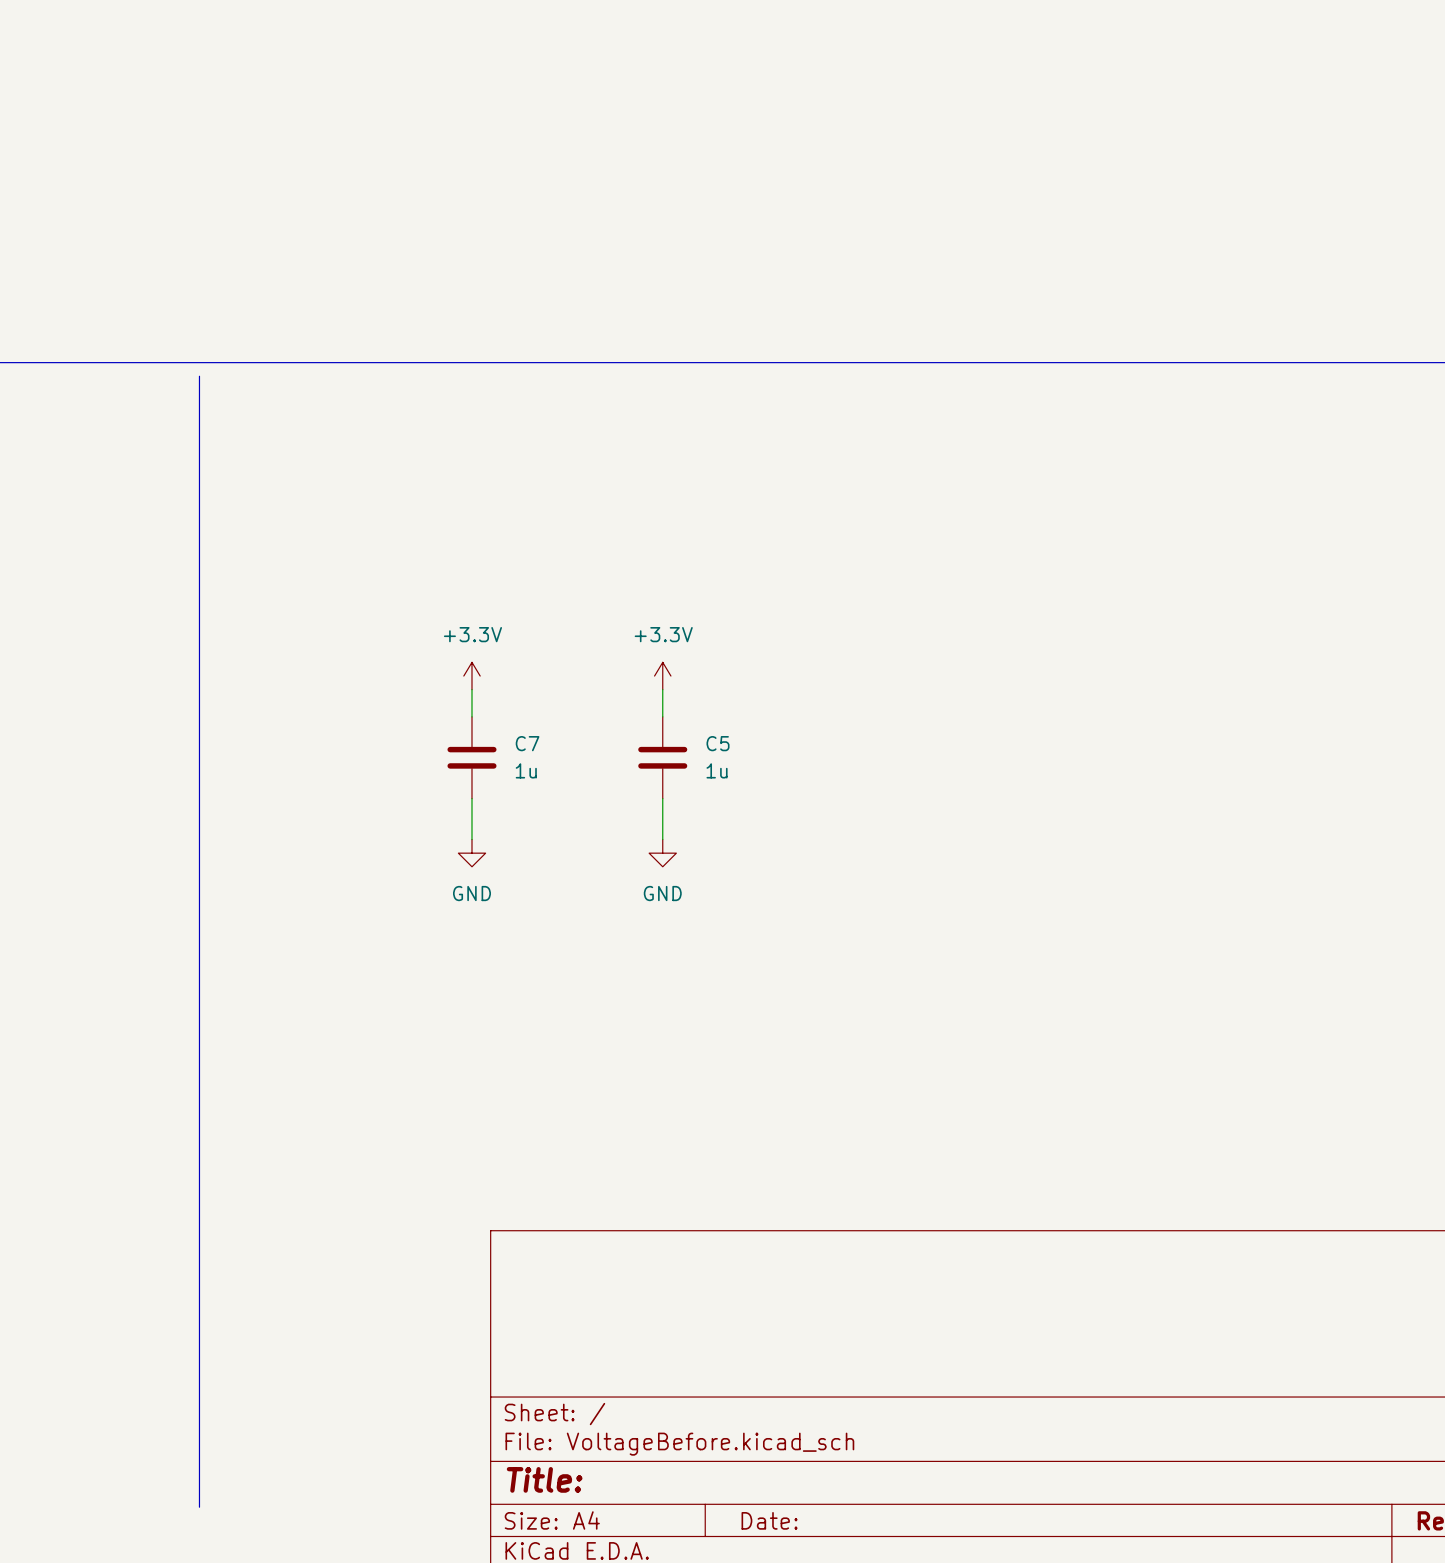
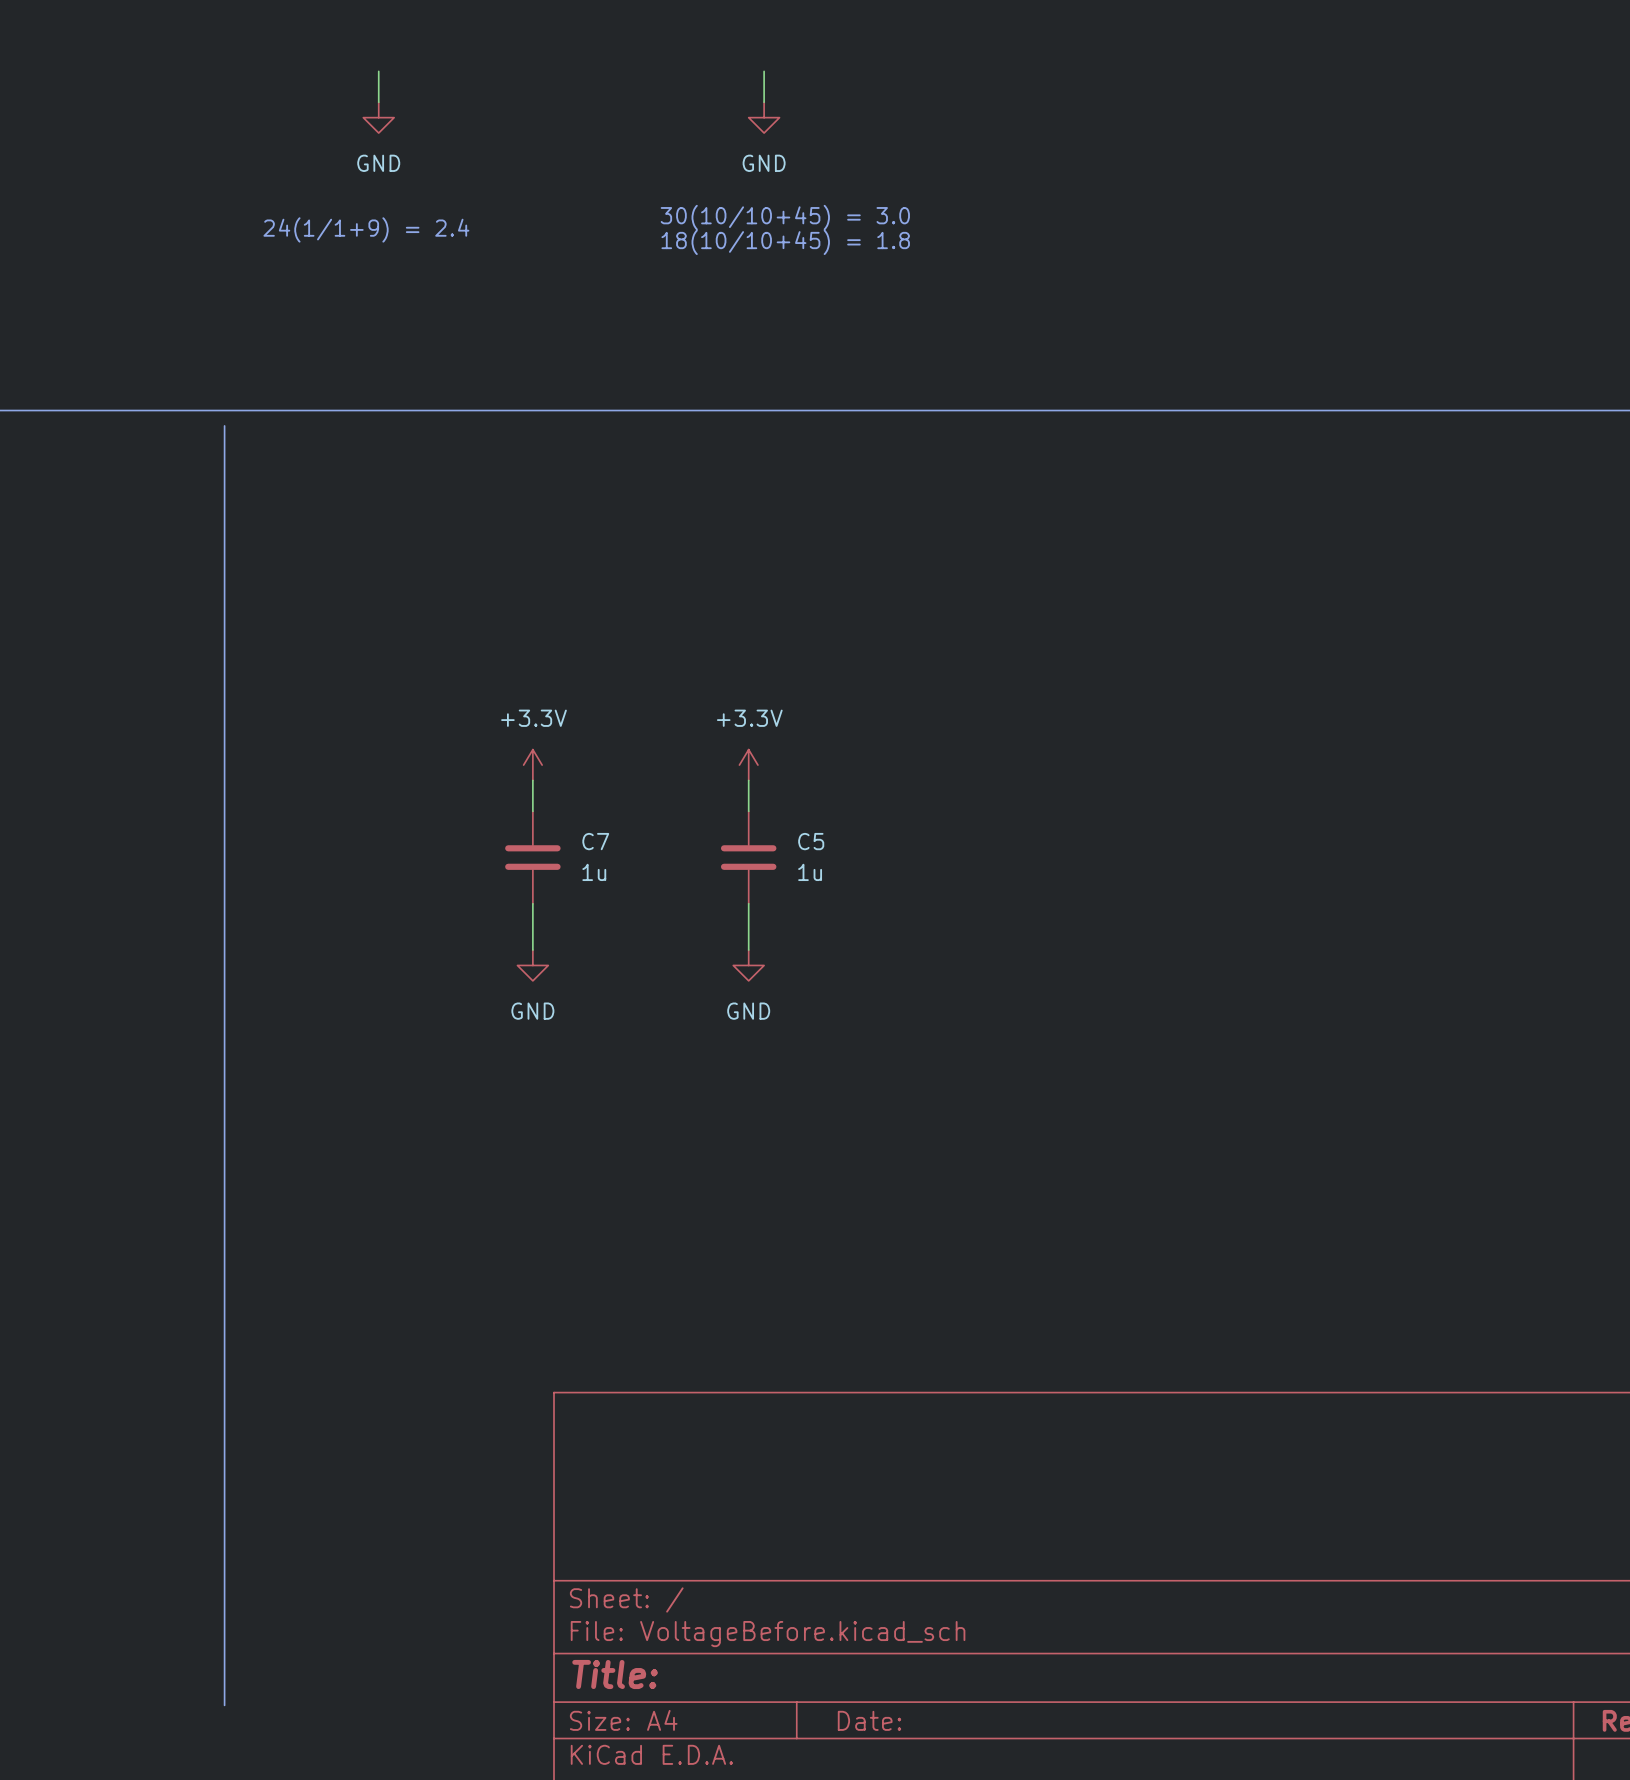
wire: none -> (378, 71) (378, 102)
wire: none -> (764, 71) (764, 102)
power symbol: none -> GND (378, 117)
power symbol: none -> GND (764, 117)
text: none -> 30(10/10+45) = 3.0 (785, 217)
text: none -> 24(1/1+9) = 2.4 (366, 229)
text: none -> 18(10/10+45) = 1.8 (785, 242)

